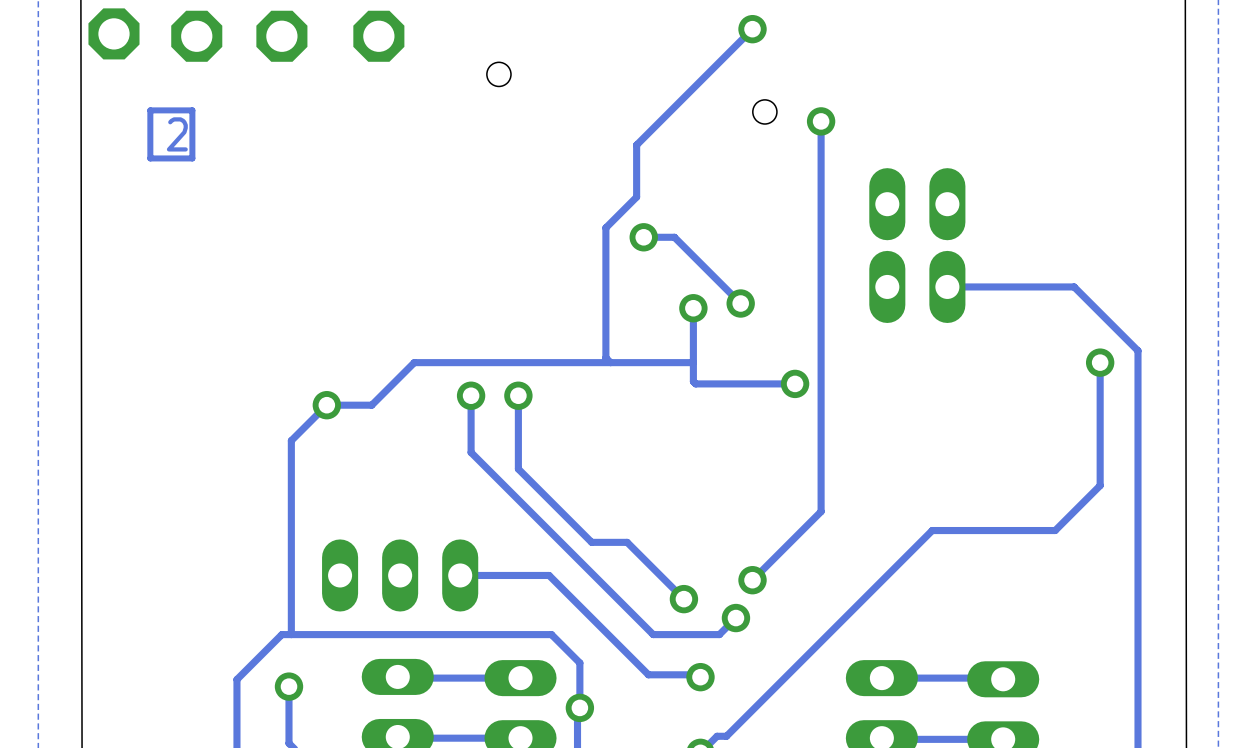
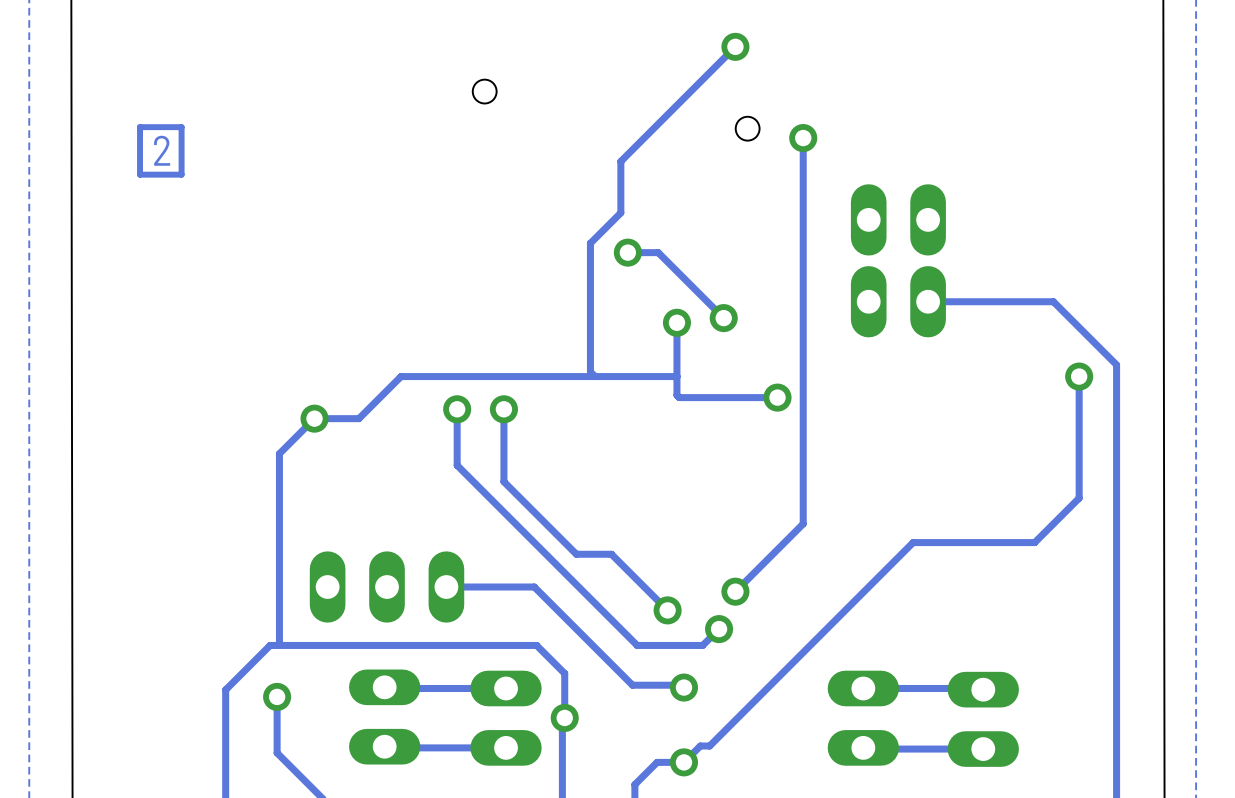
part: (113, 33) -> none
part: (196, 36) -> none
part: (281, 36) -> none
part: (378, 36) -> none

